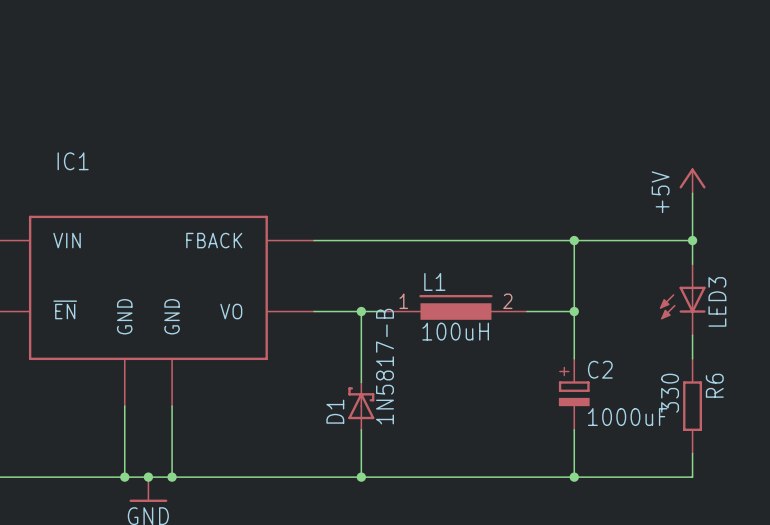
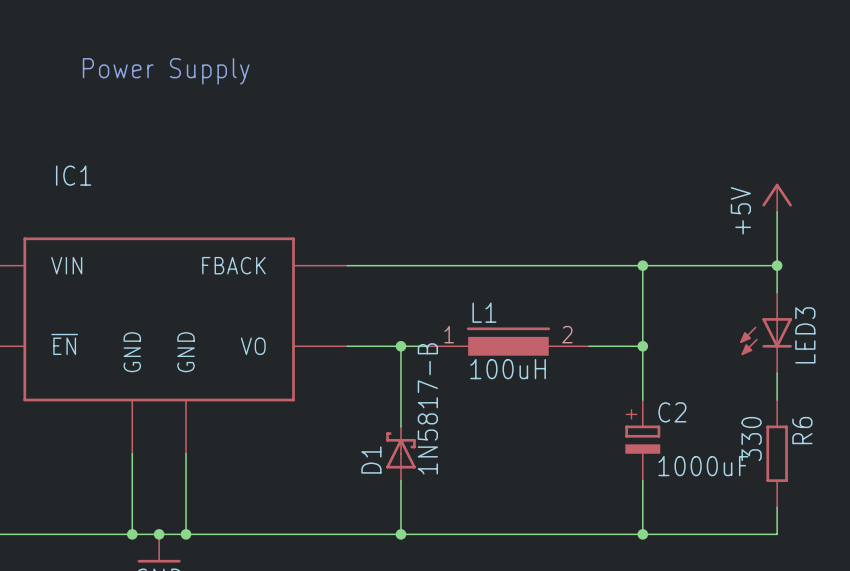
text: none -> Power Supply (166, 71)

